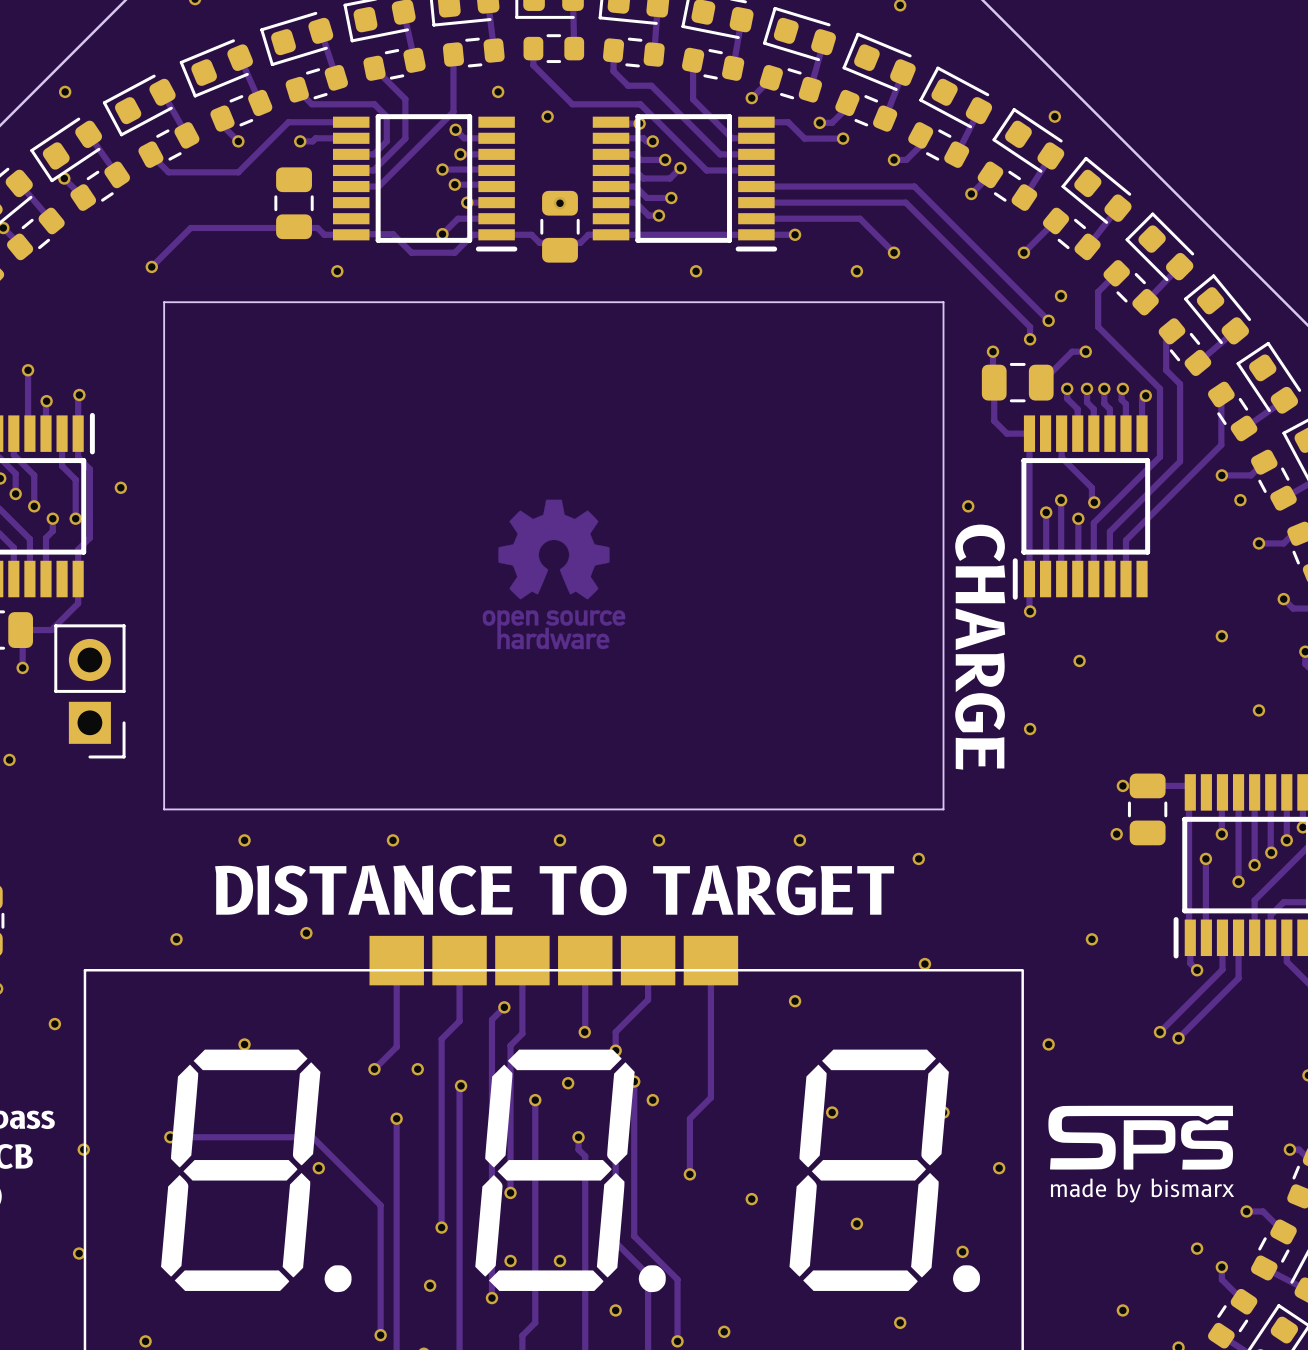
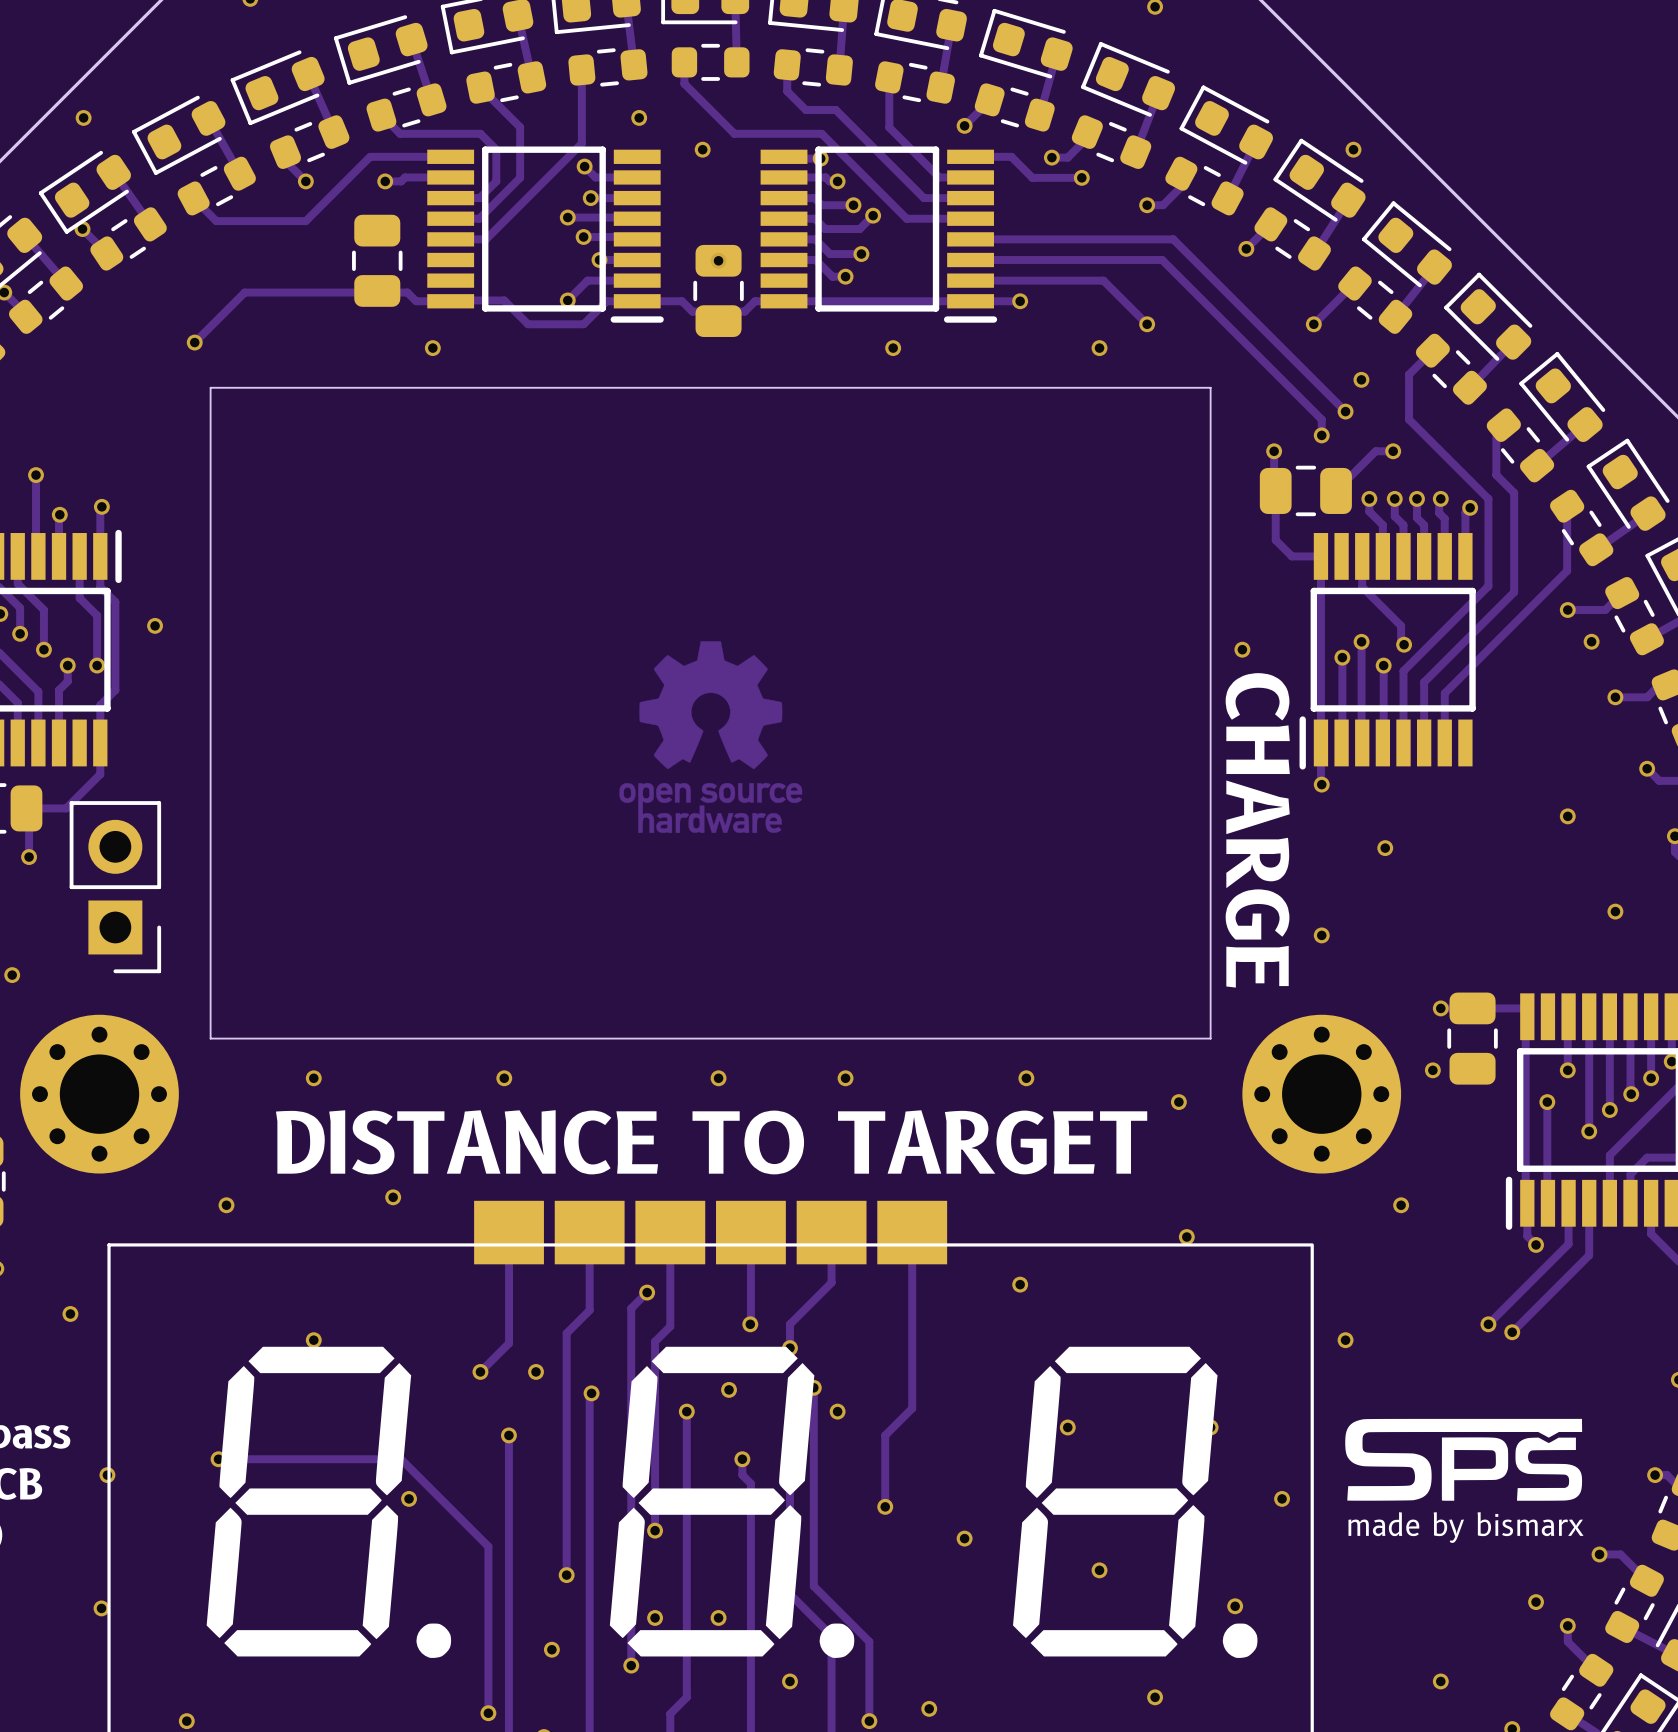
part: none -> (99, 1094)
part: none -> (1321, 1094)

